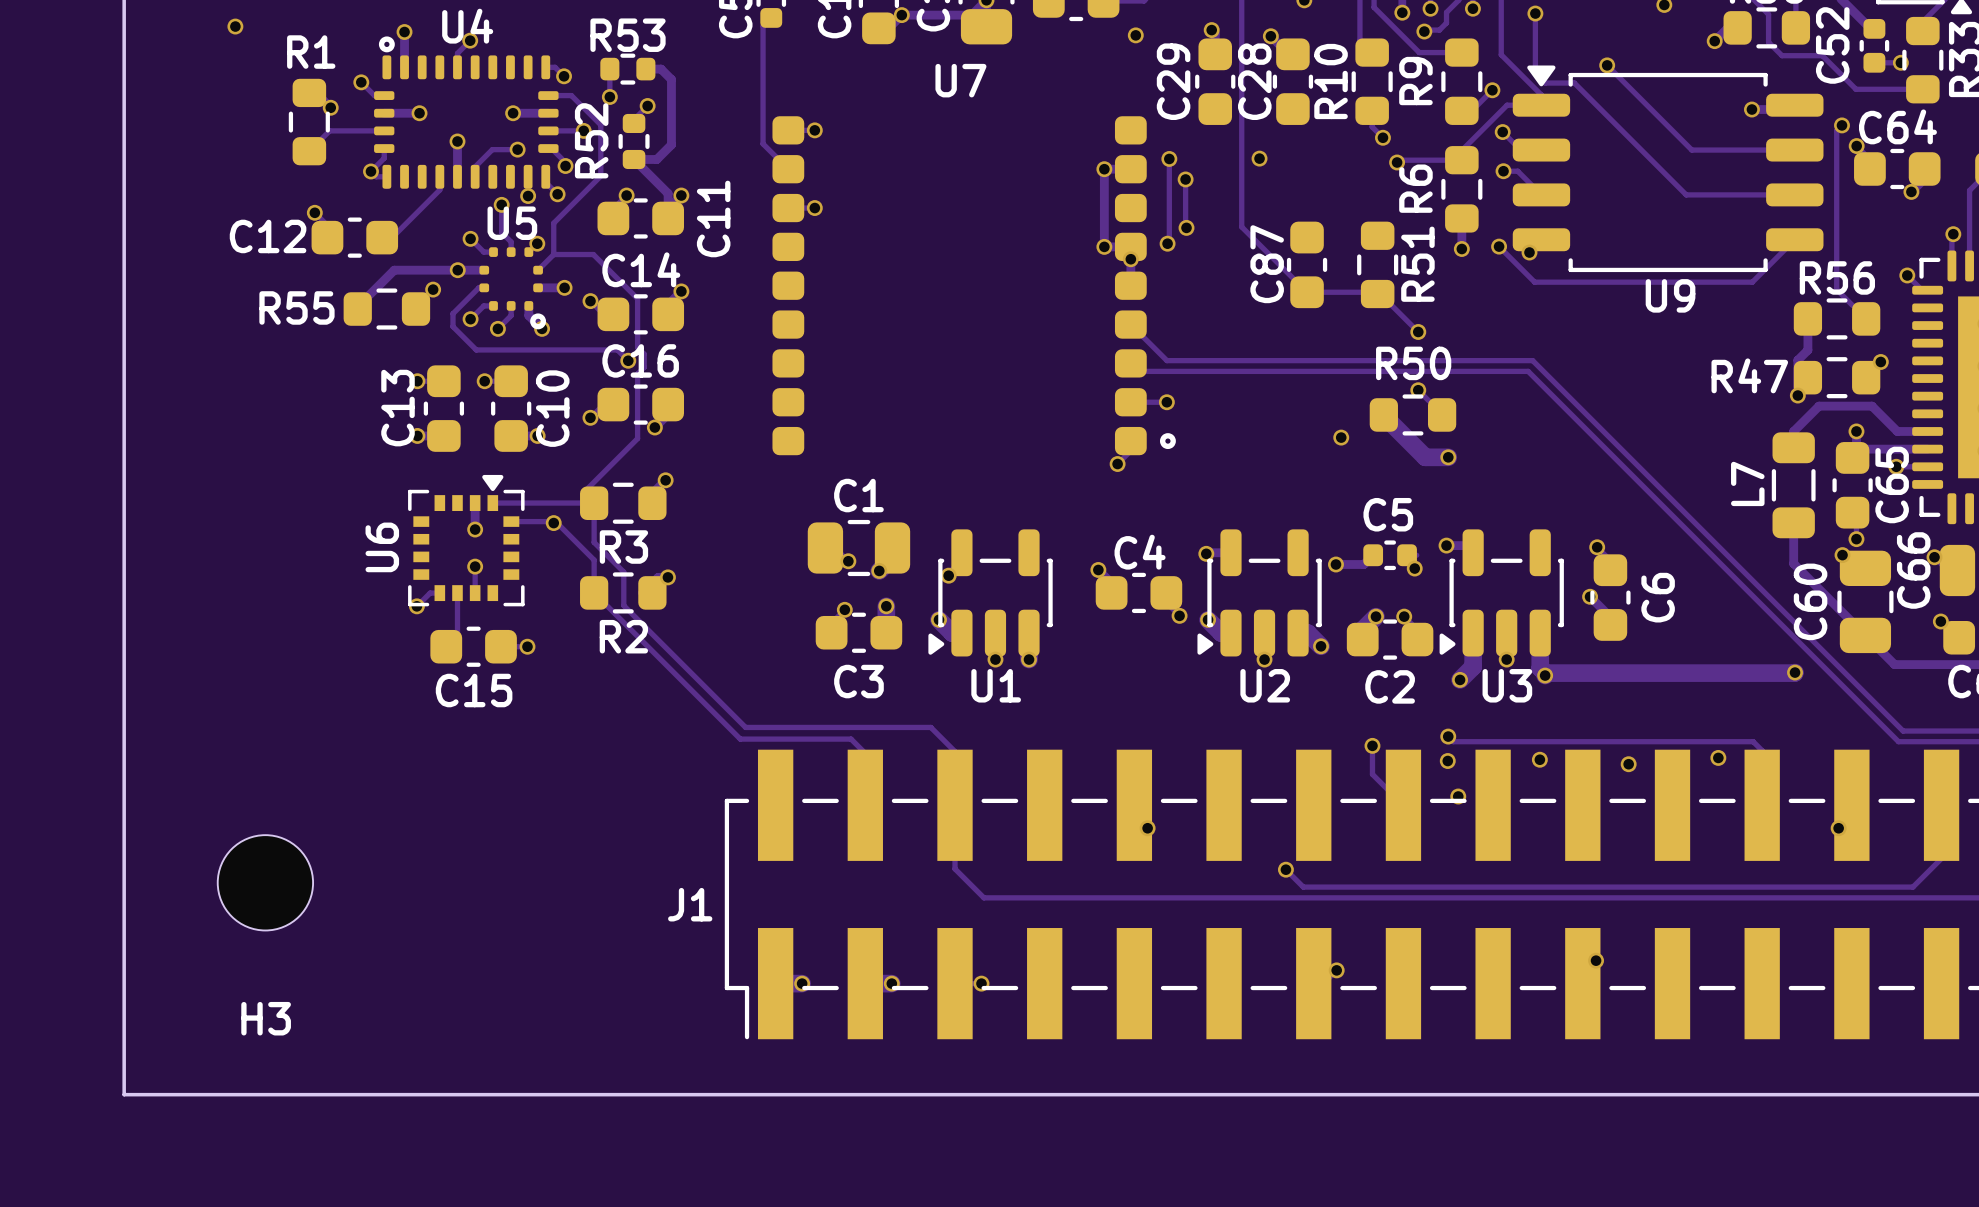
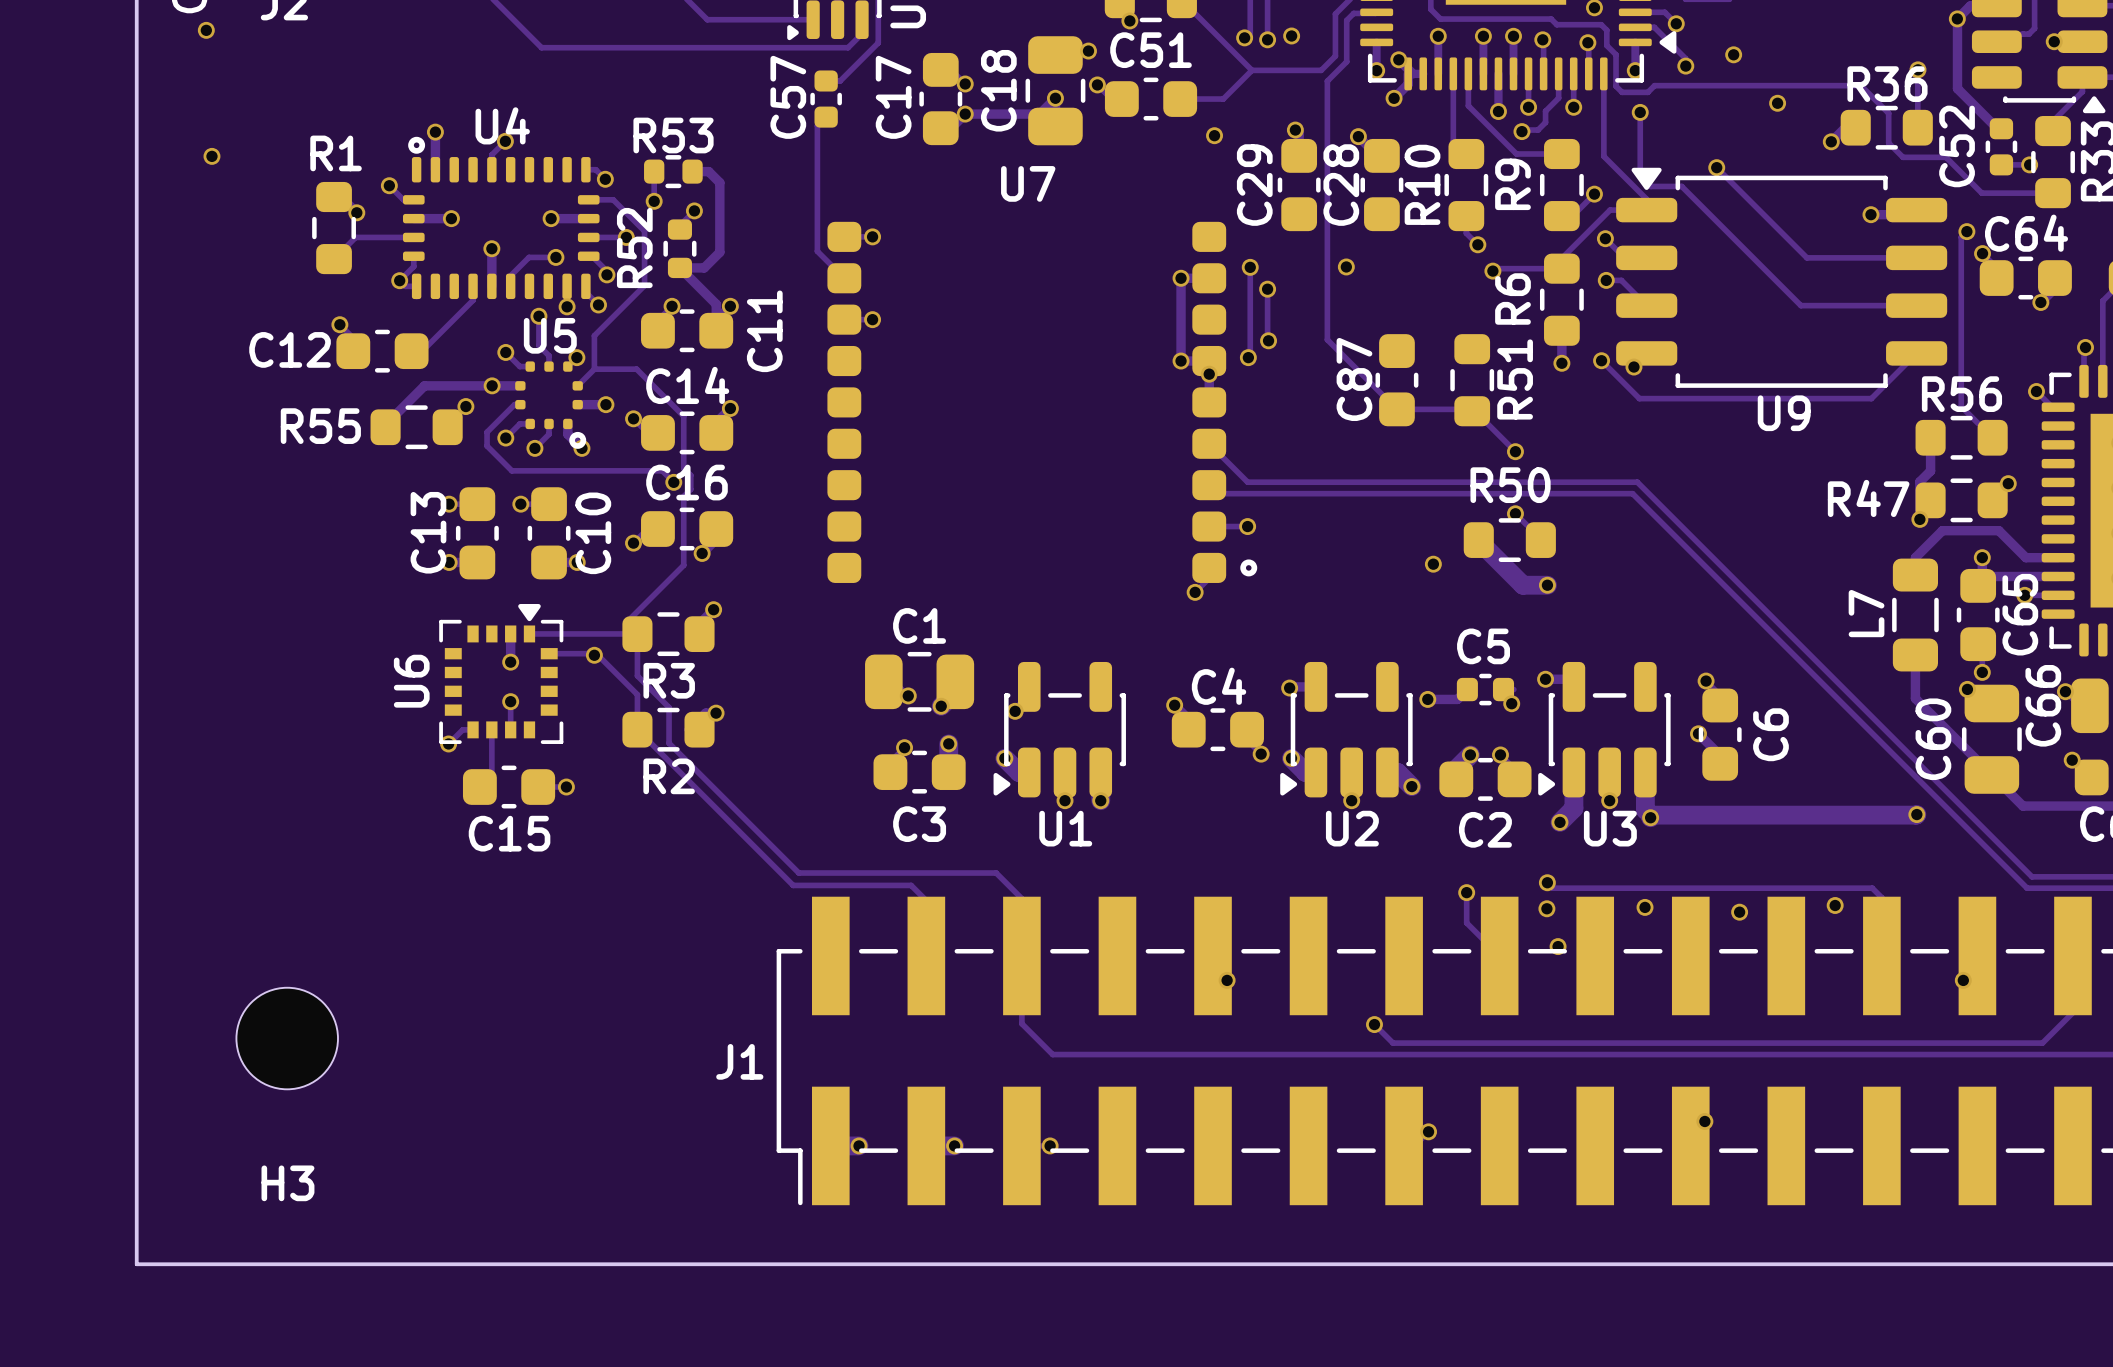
via position: (235, 26) -> (211, 156)

